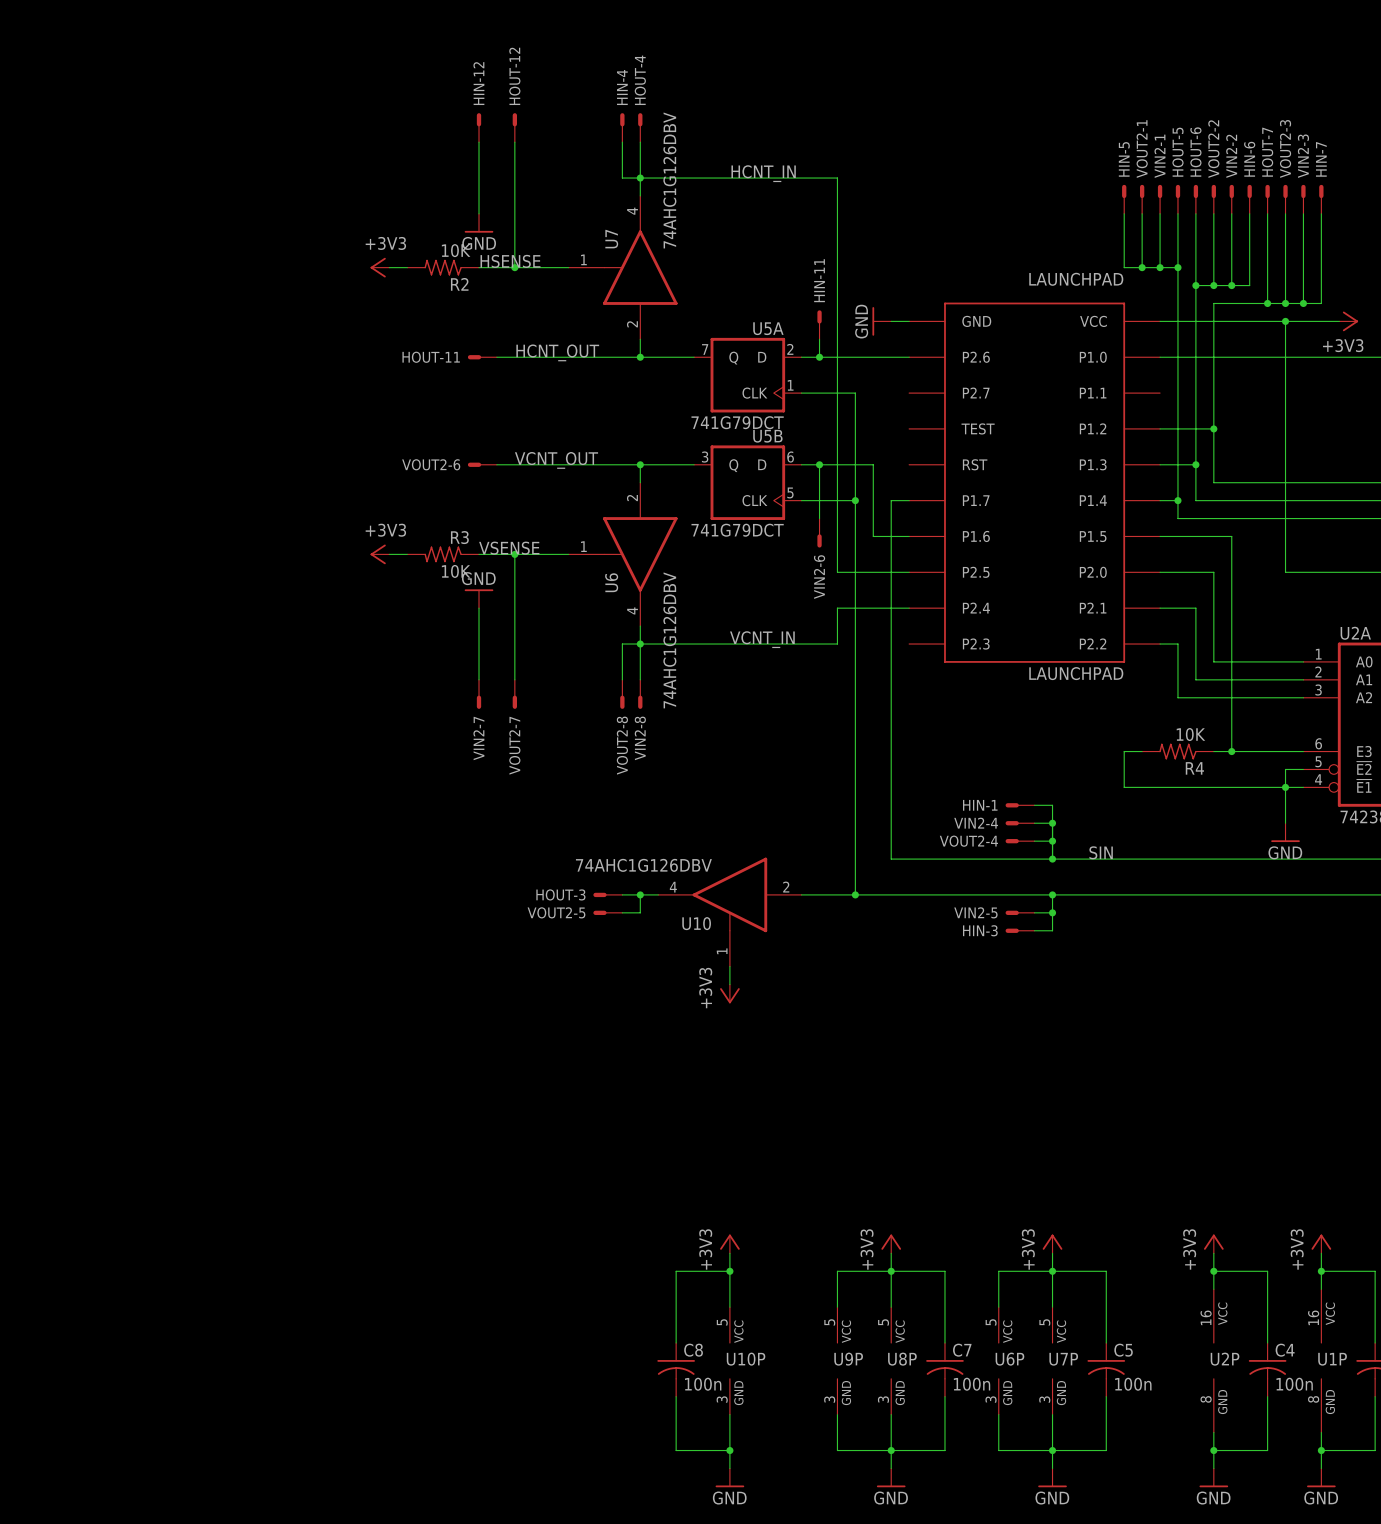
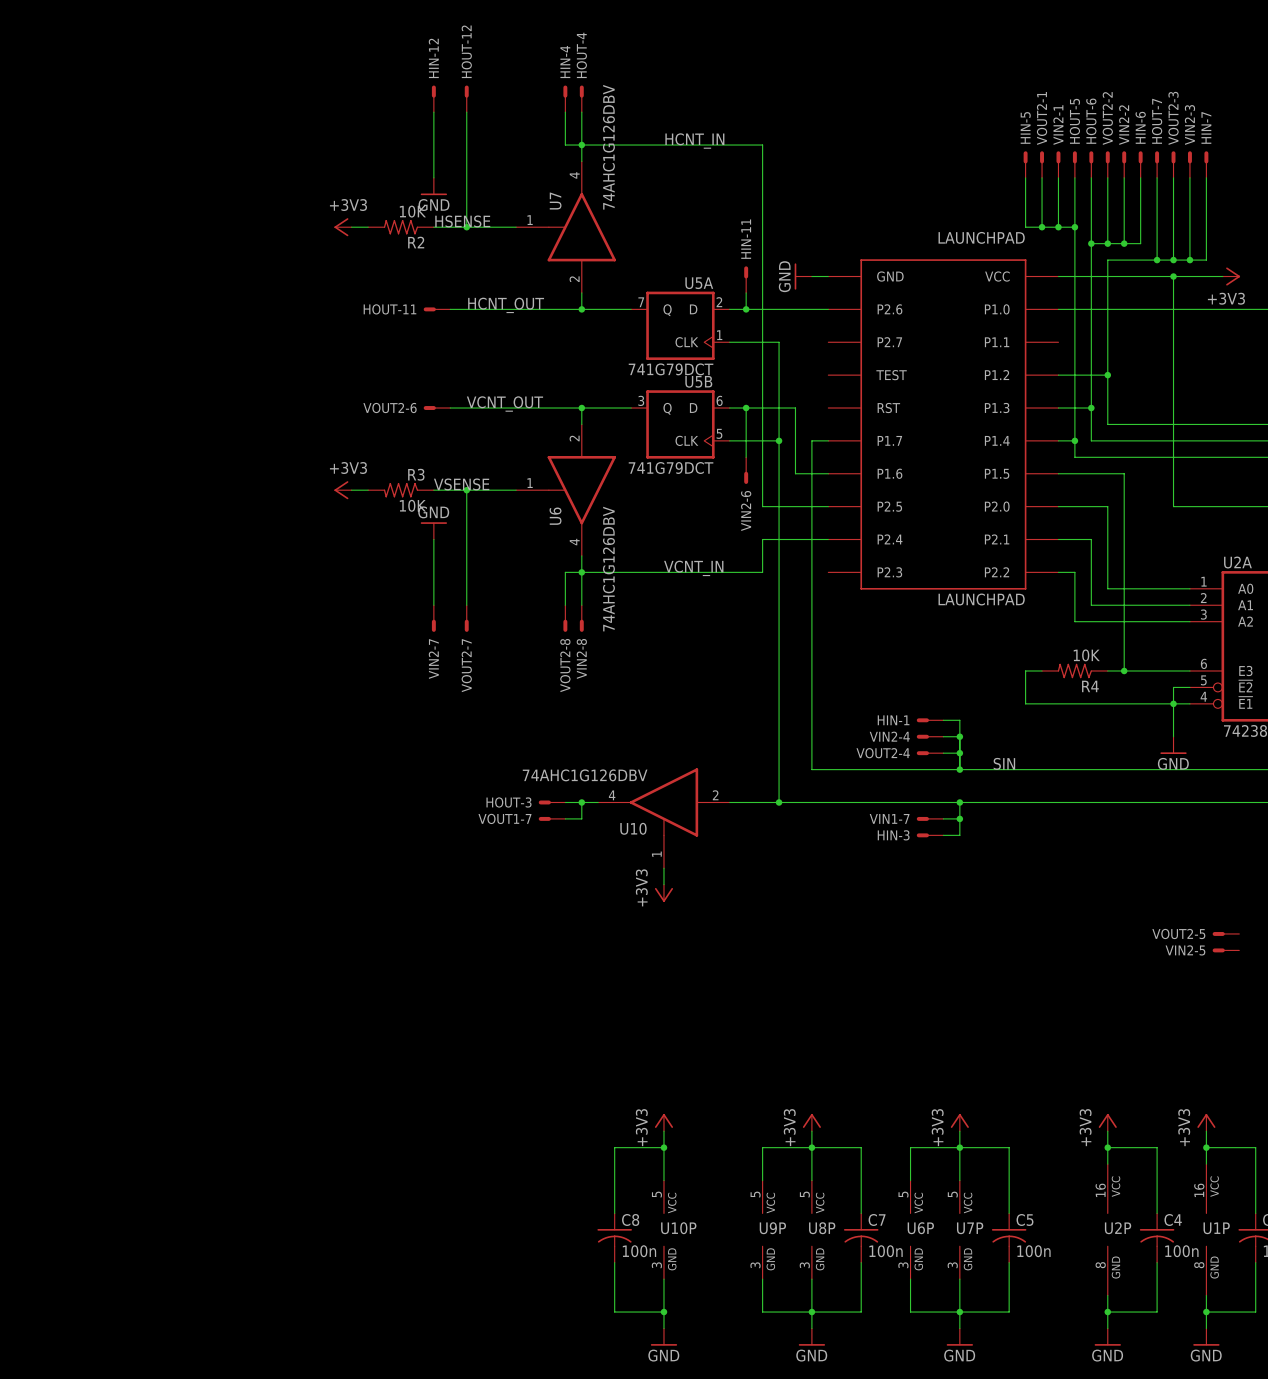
VOUT2-5 name: VOUT2-5 (556, 912) -> VOUT1-7 (504, 818)
VIN2-5 name: VIN2-5 (975, 912) -> VIN1-7 (889, 818)
VOUT2-5: none -> (1225, 933)
VIN2-5: none -> (1225, 950)

